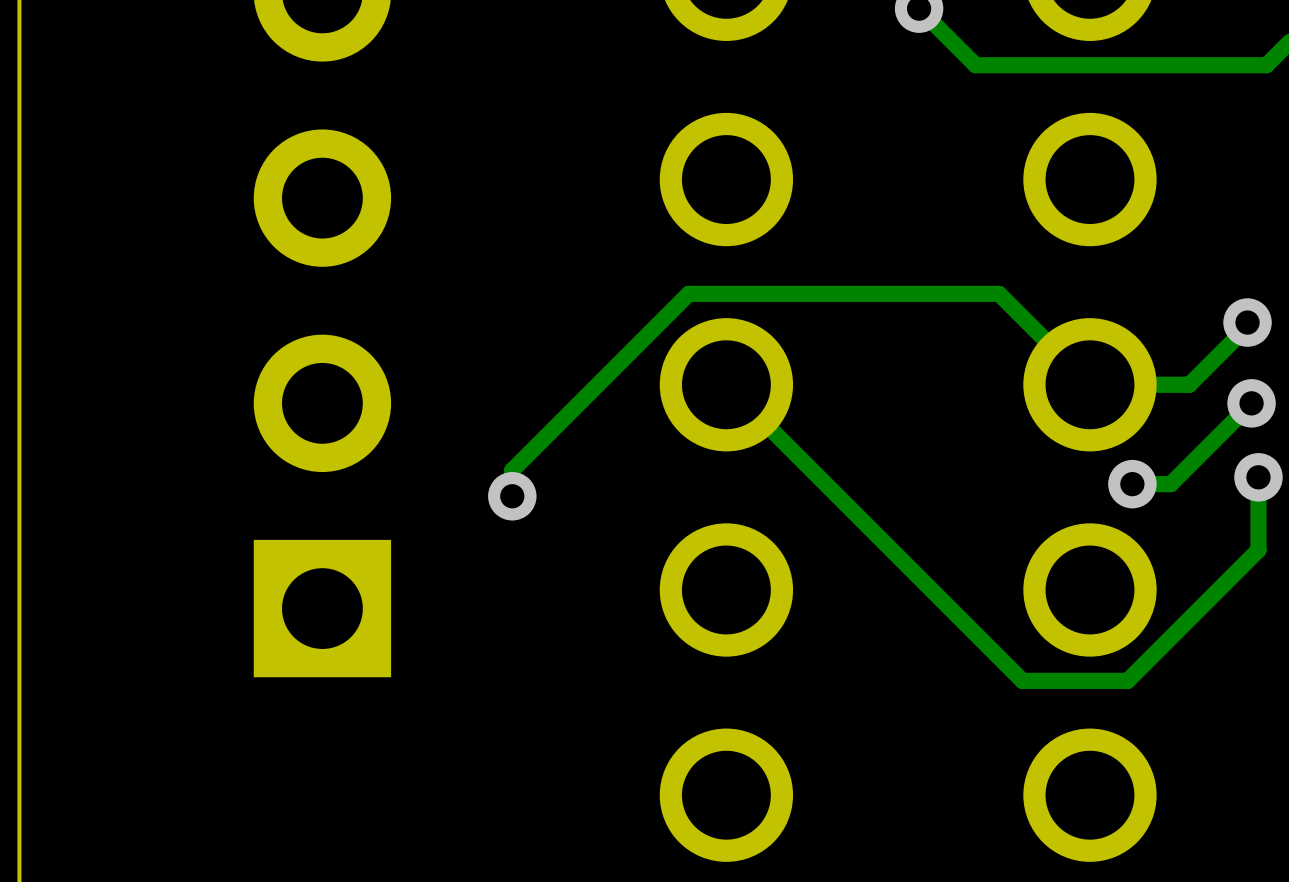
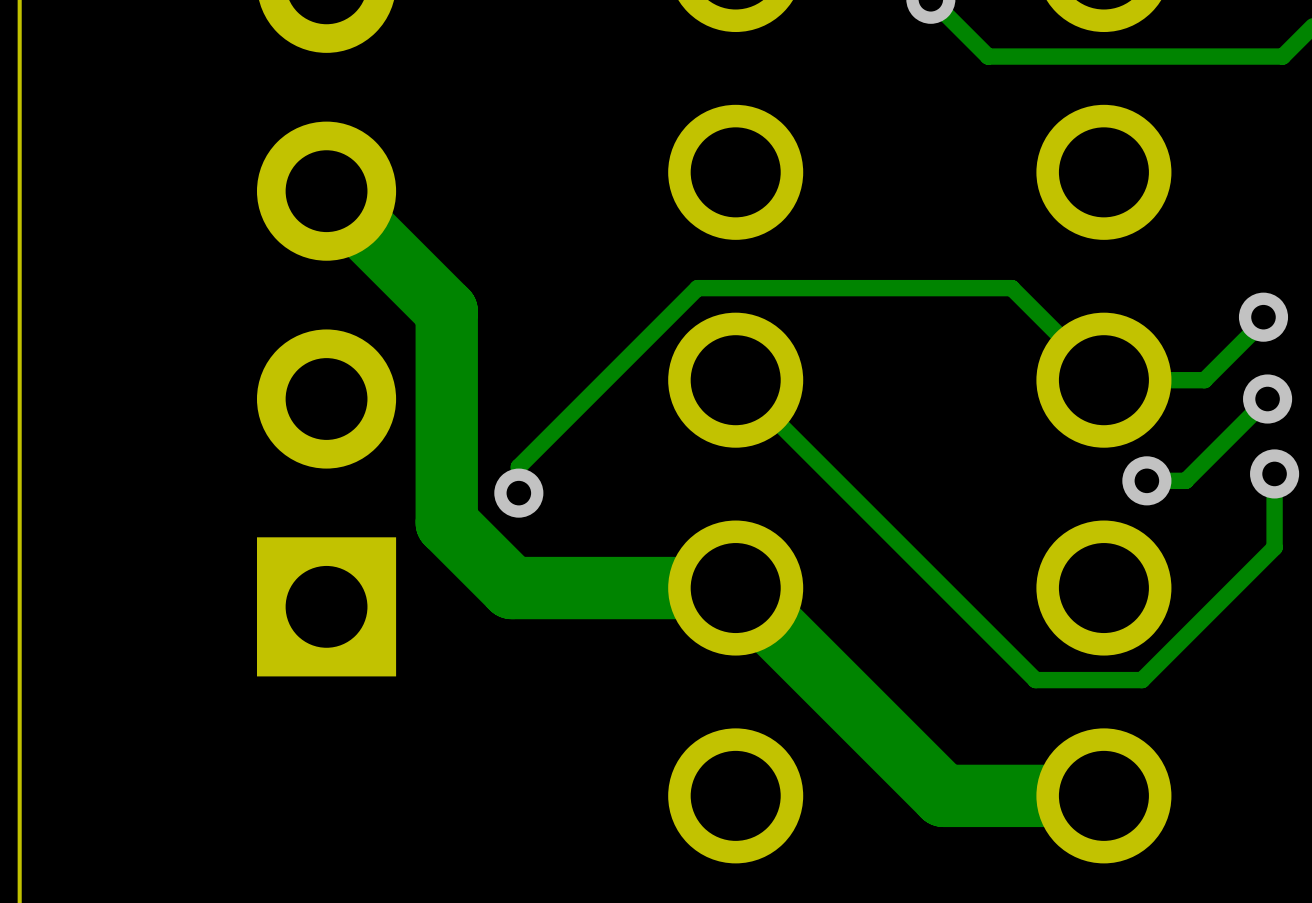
track: none -> (326, 191) (446, 311) (446, 522) (511, 588) (735, 588) (943, 795) (1103, 795)

